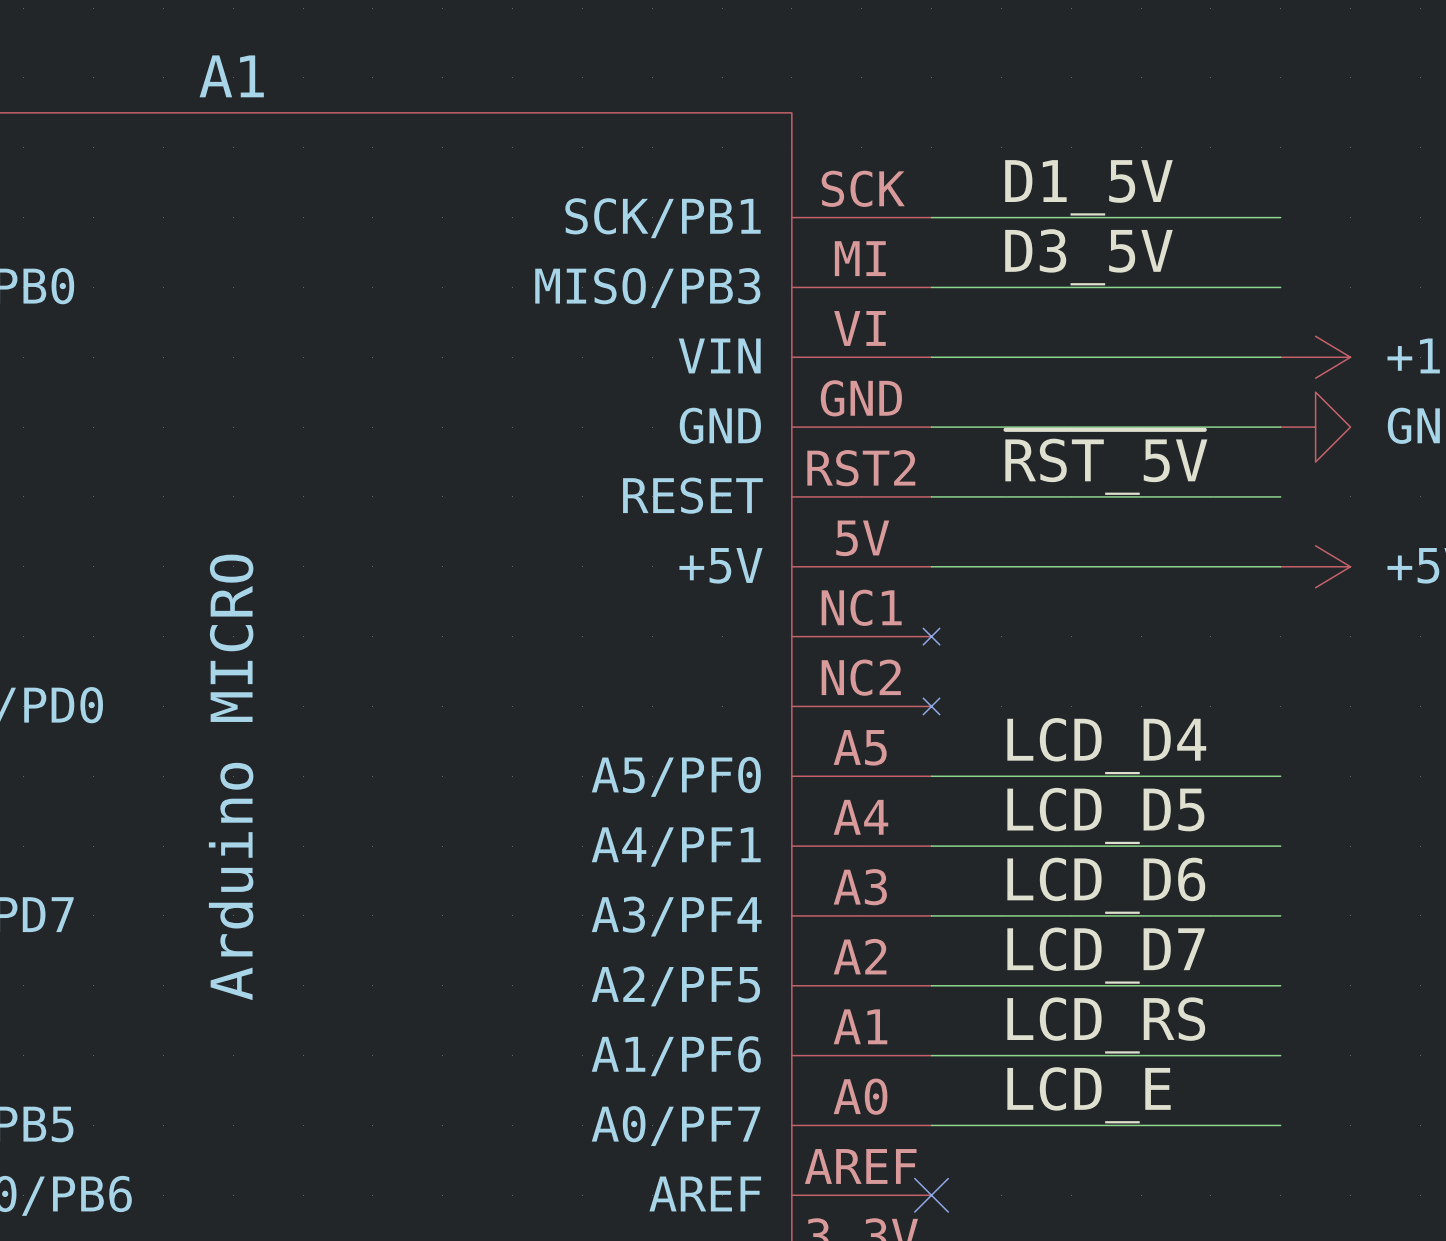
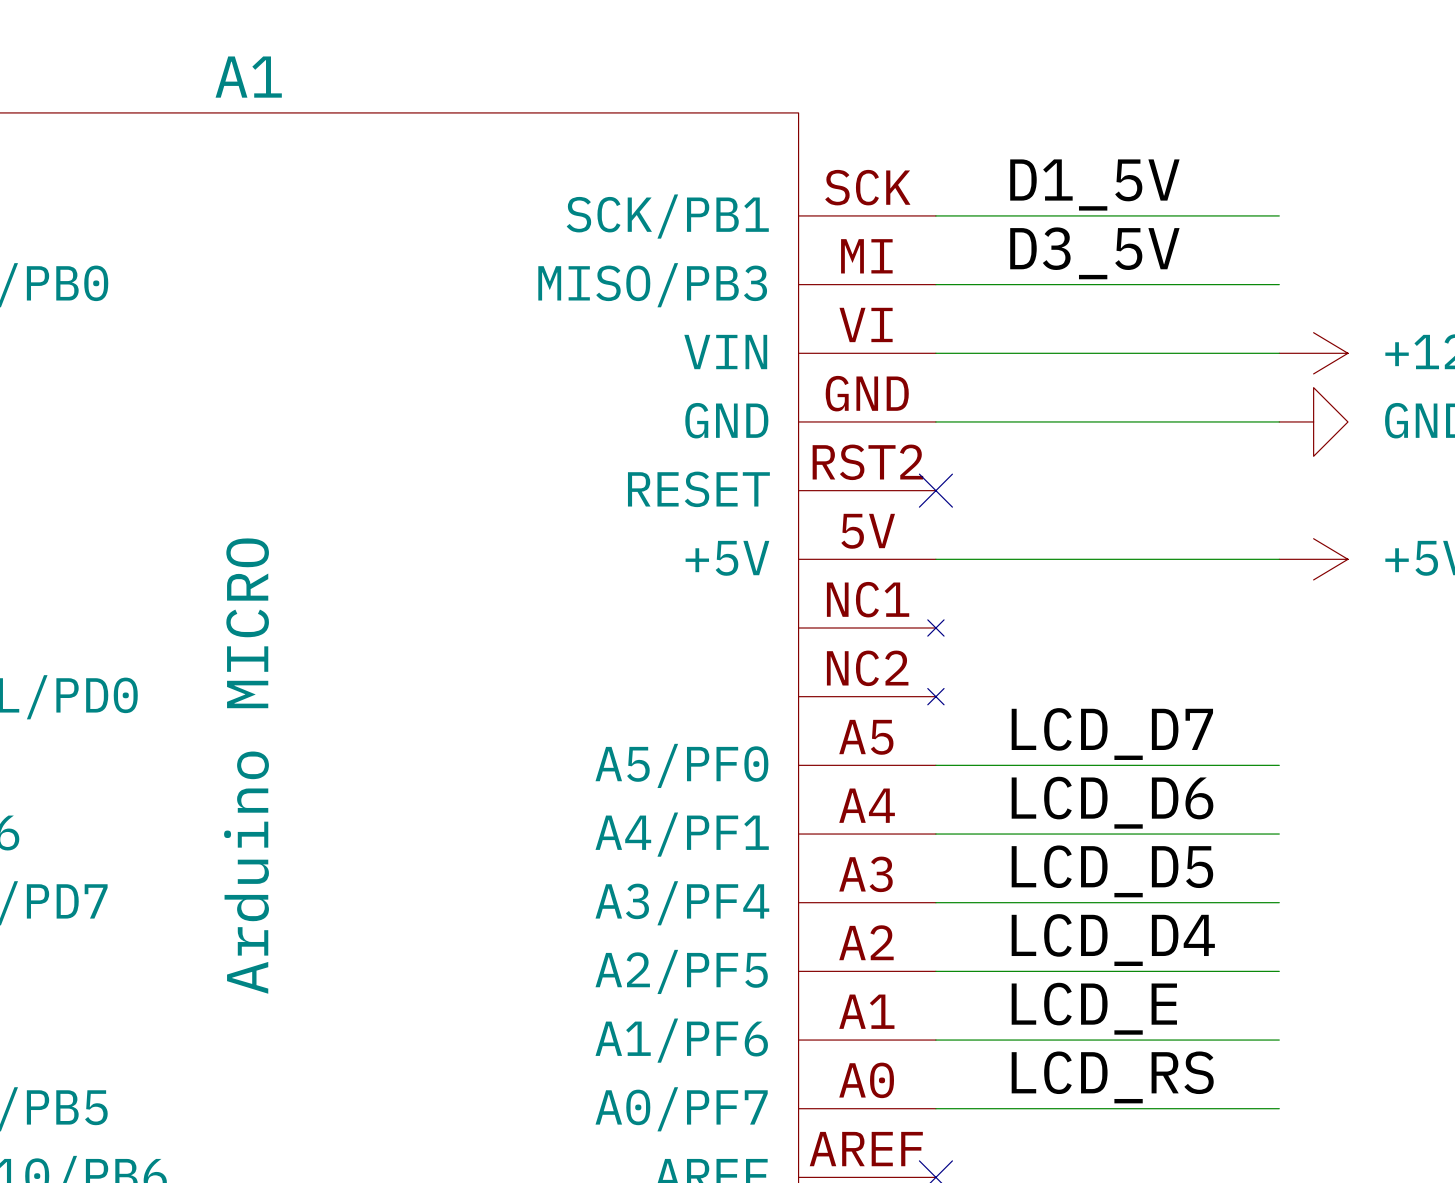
label: ~{RST_5V} (1106, 462) -> none
wire: (931, 496) (1280, 496) -> none
no-connect mark: none -> (935, 490)
label: LCD_D4 (1106, 746) -> LCD_D7 (1112, 734)
label: LCD_D5 (1105, 815) -> LCD_D6 (1112, 802)
label: LCD_D6 (1106, 885) -> LCD_D5 (1112, 871)
label: LCD_D7 (1106, 955) -> LCD_D4 (1113, 940)
label: LCD_RS (1106, 1025) -> LCD_E (1094, 1008)
label: LCD_E (1089, 1095) -> LCD_RS (1112, 1077)

